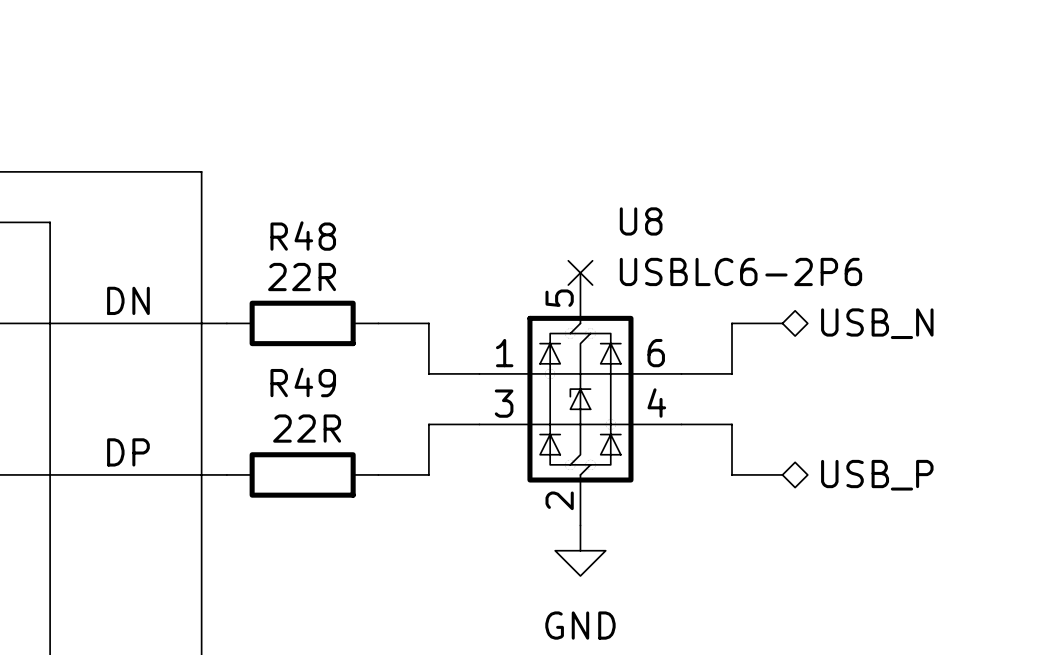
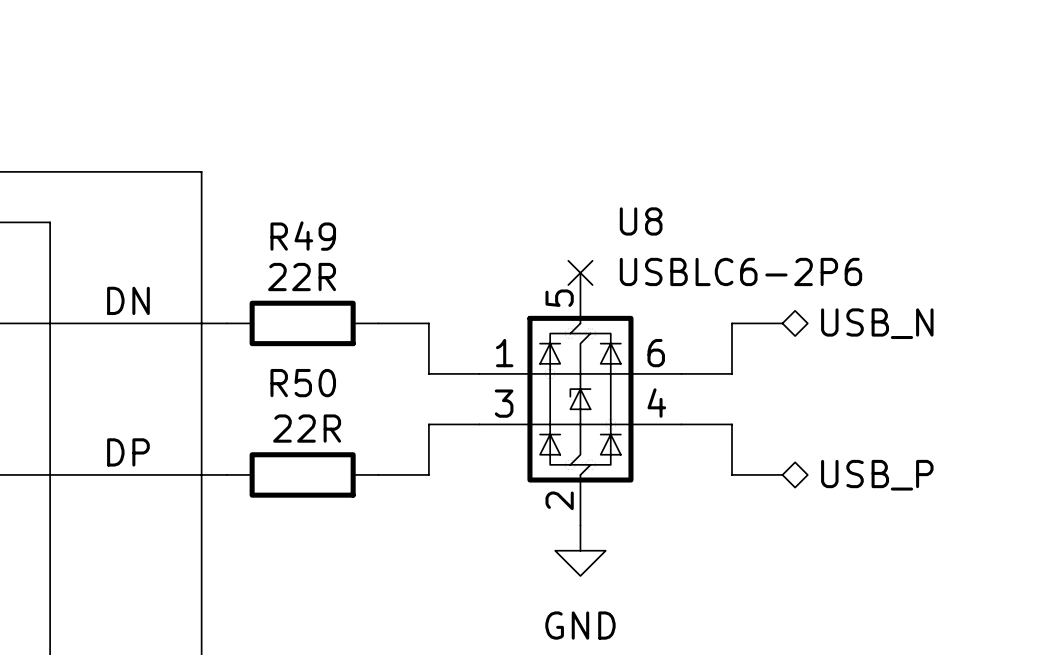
R48 name: R48 (303, 236) -> R49 (303, 236)
R49 name: R49 (303, 382) -> R50 (303, 383)

